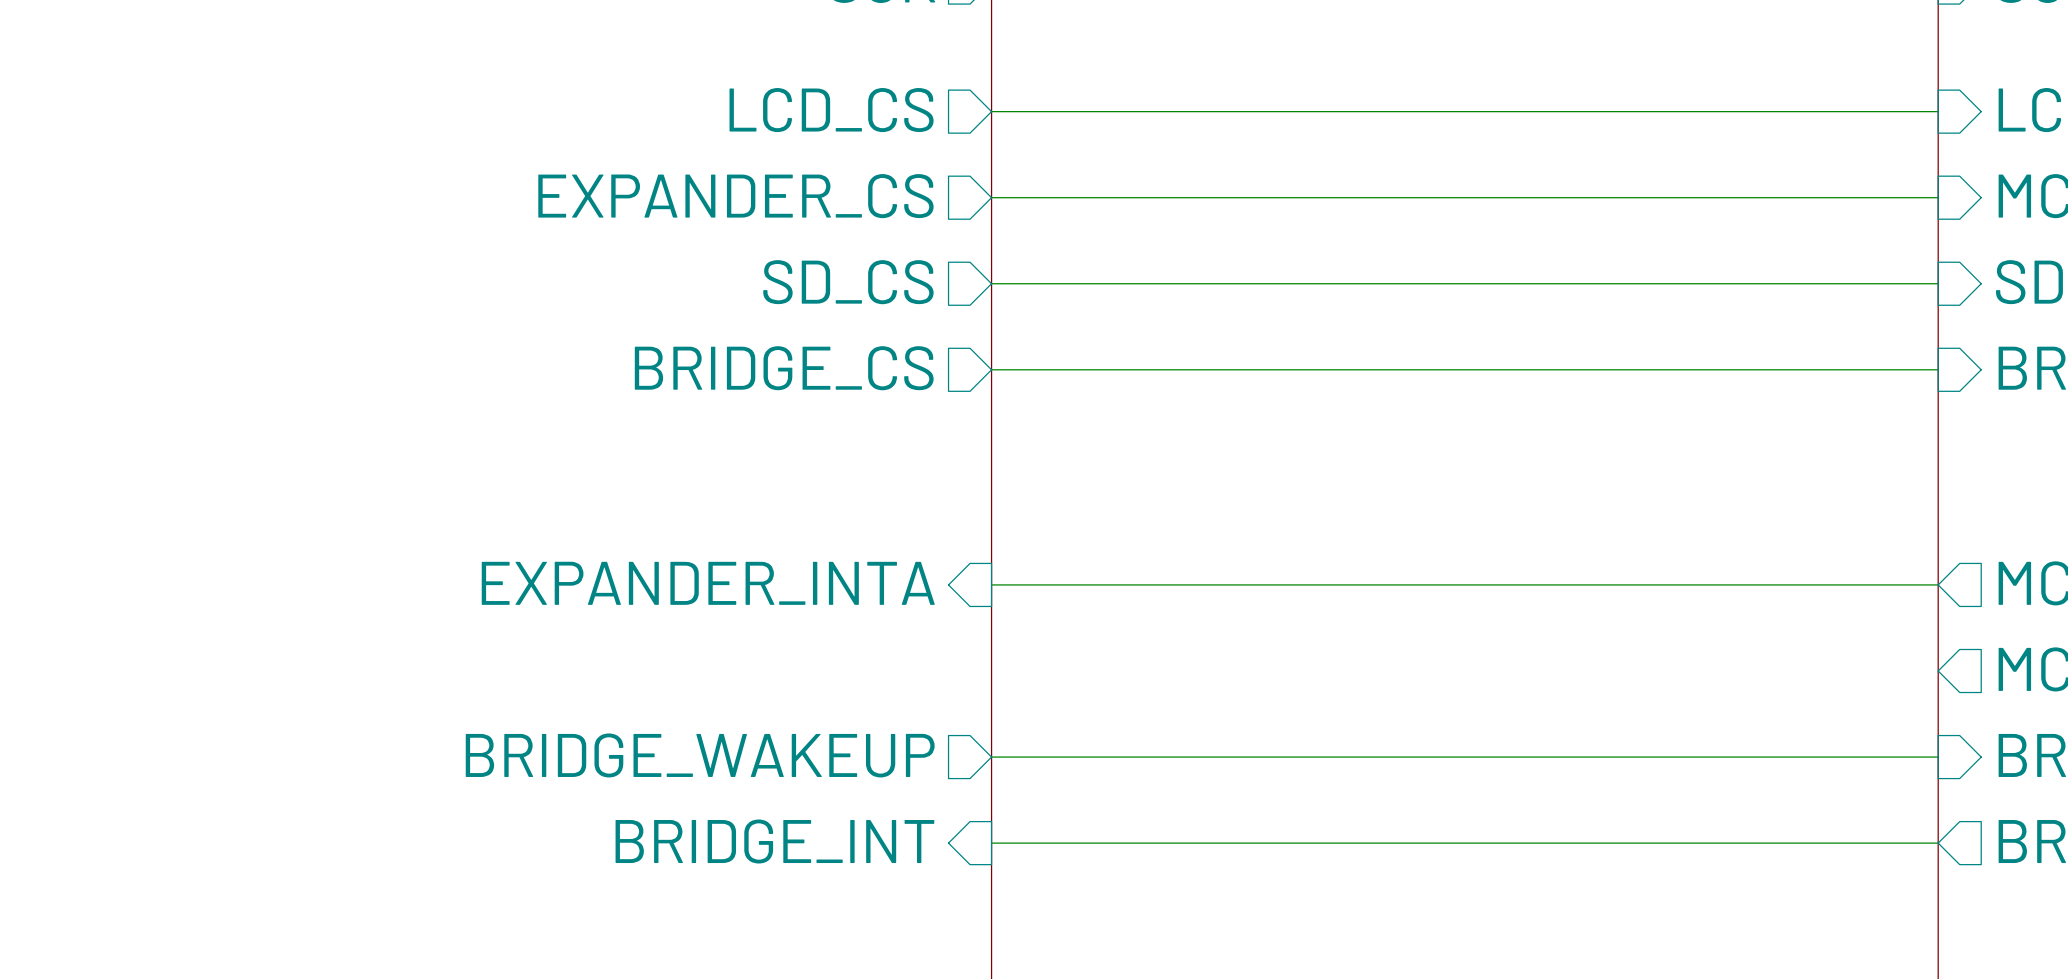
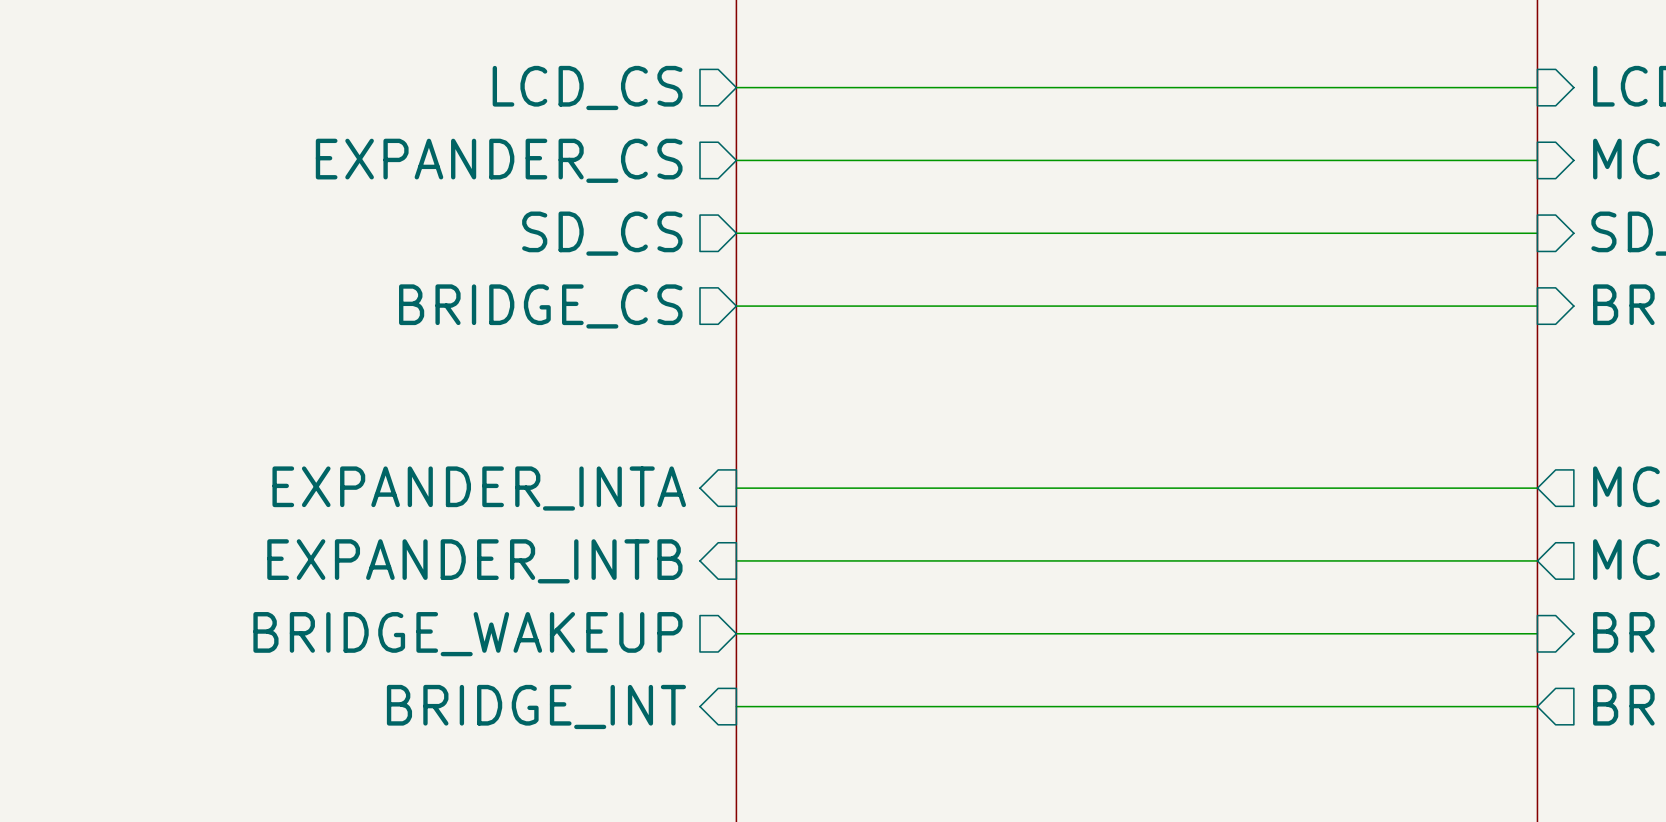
sheet pin: none -> EXPANDER_INTB (474, 561)
wire: none -> (736, 560) (1537, 560)

